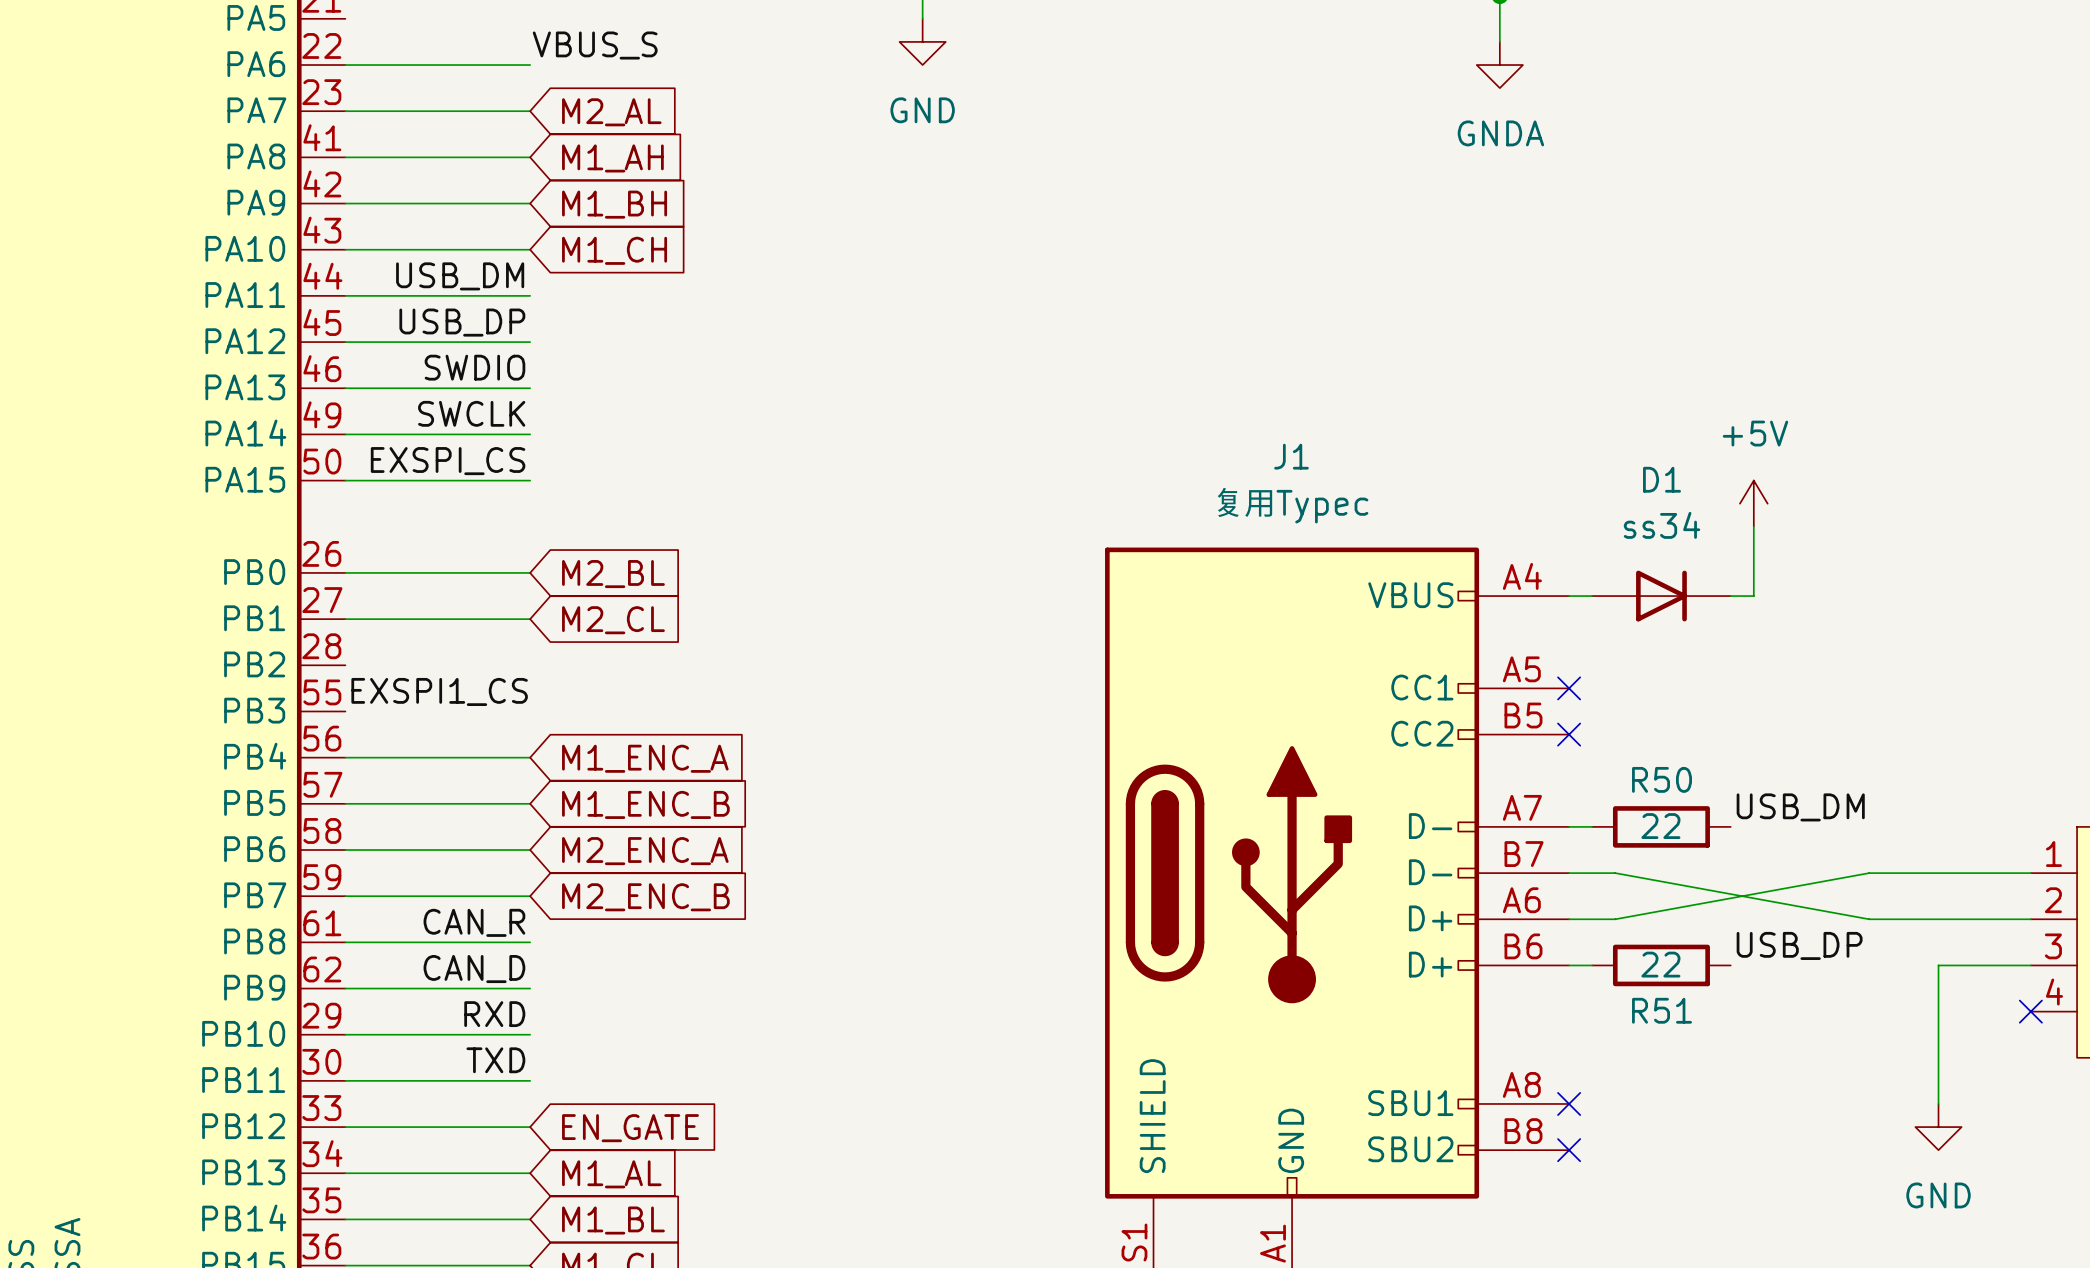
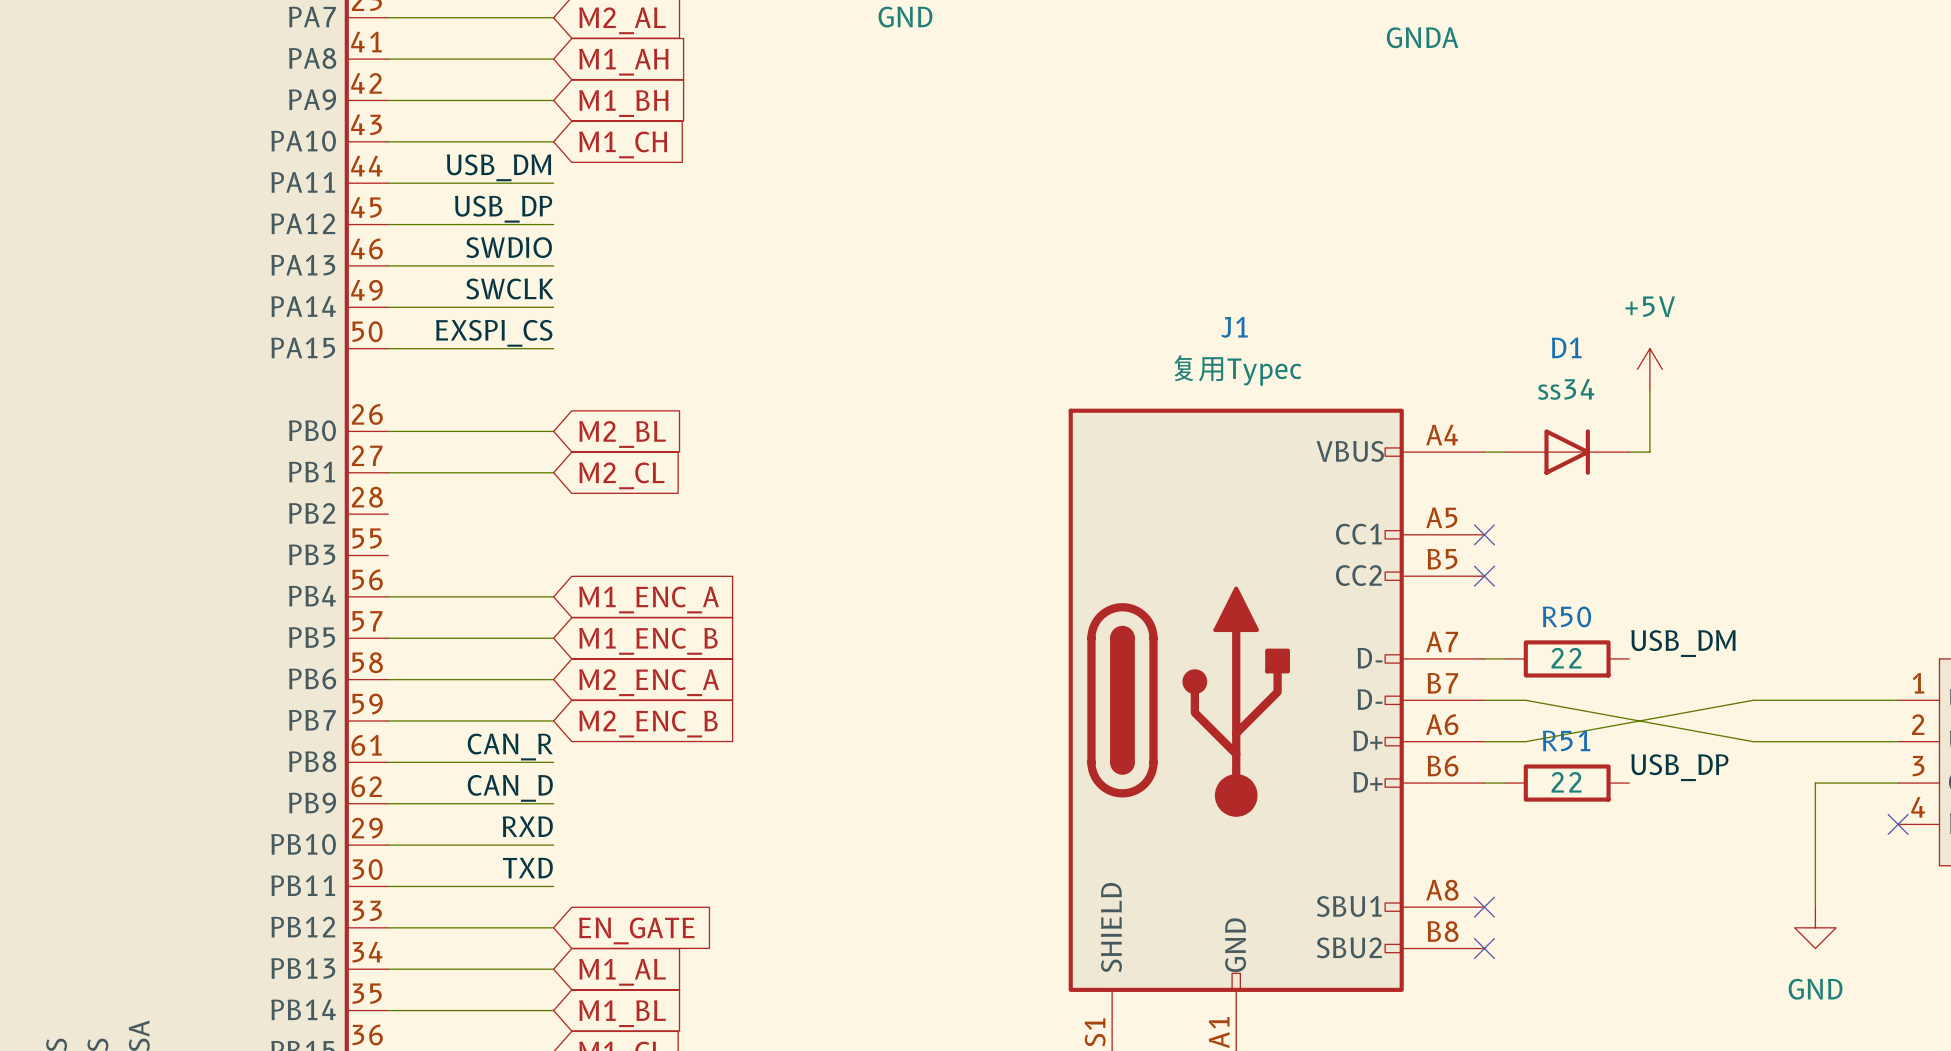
label: EXSPI1_CS (439, 691) -> none
R51 name position: R51 (1662, 1010) -> R51 (1566, 740)

